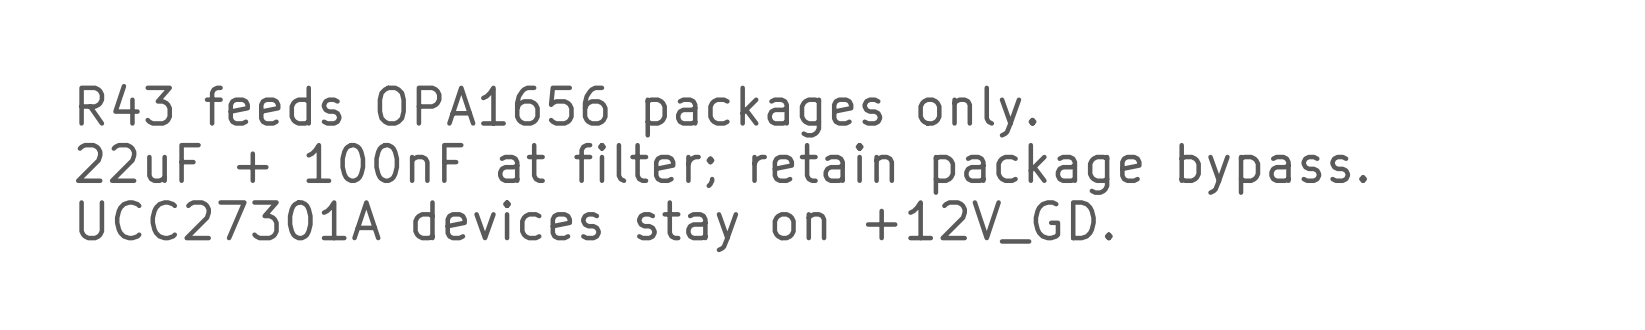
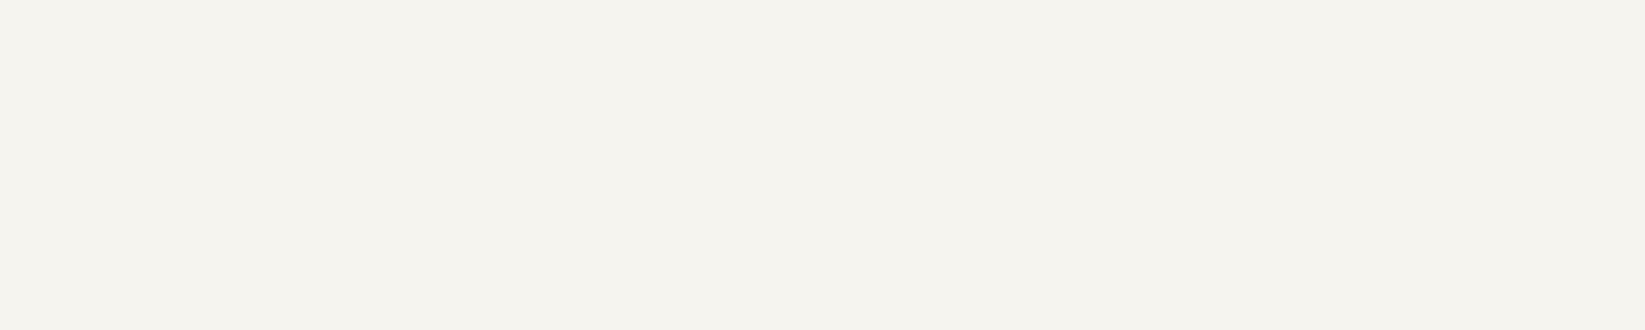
text: R43 feeds OPA1656 packages only. (557, 110) -> none
text: 22uF + 100nF at filter; retain package bypass. (721, 168) -> none
text: UCC27301A devices stay on +12V_GD. (596, 226) -> none

